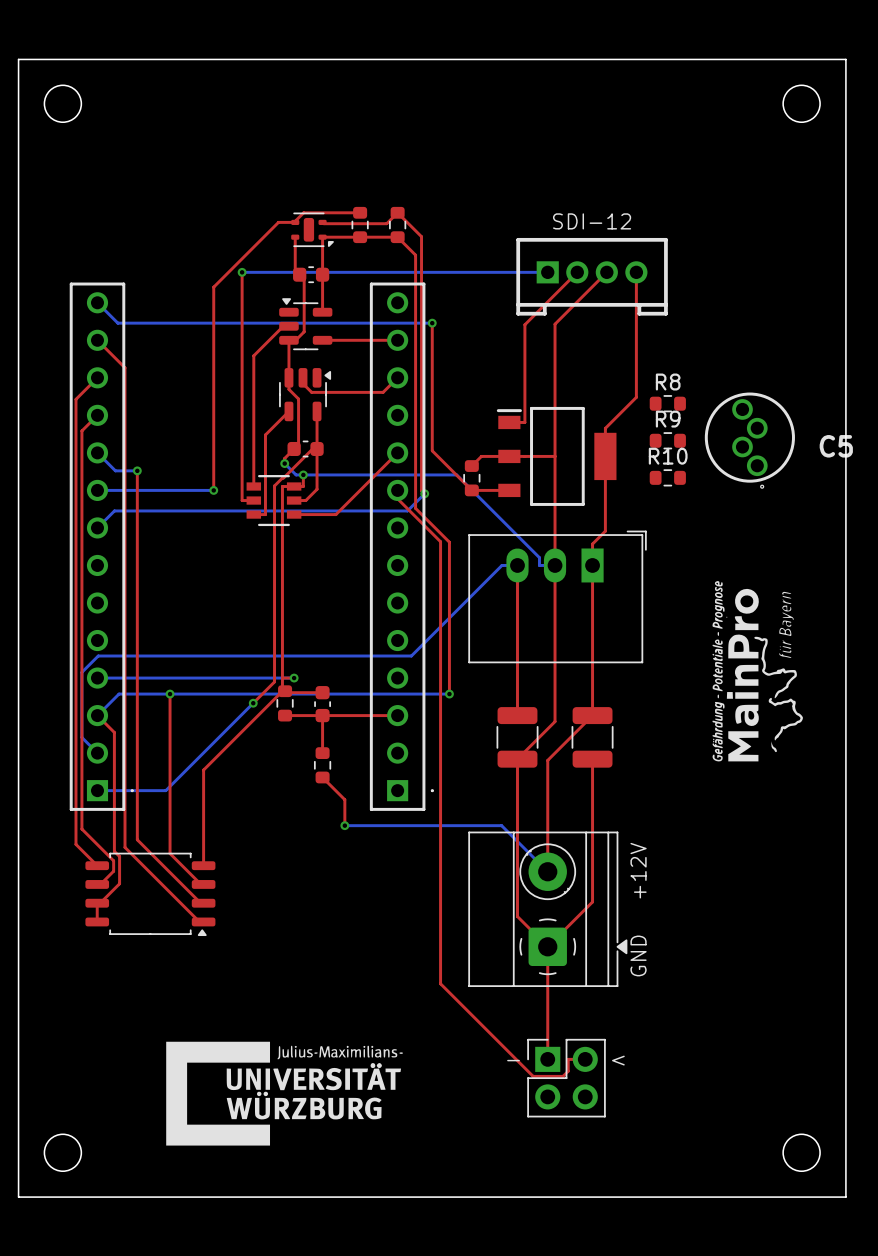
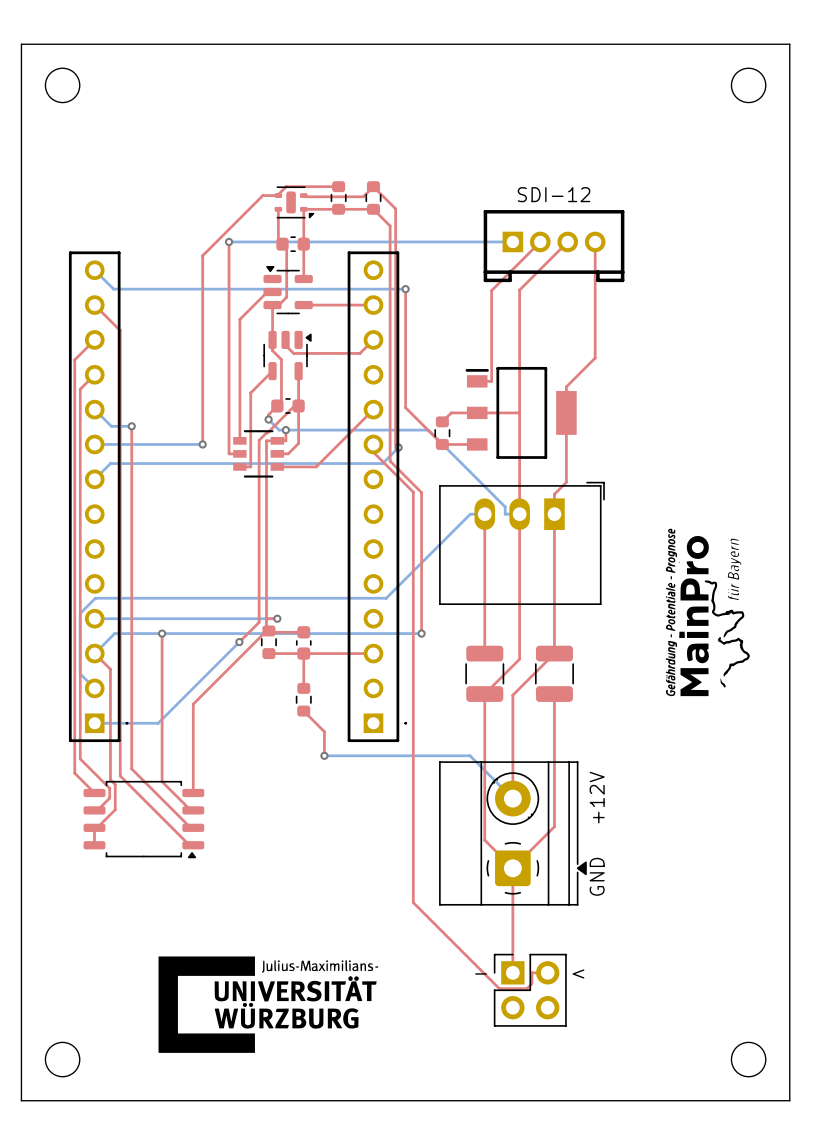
R8: (667, 403) -> none
R9: (667, 440) -> none
C5: (749, 440) -> none
R10: (667, 477) -> none

